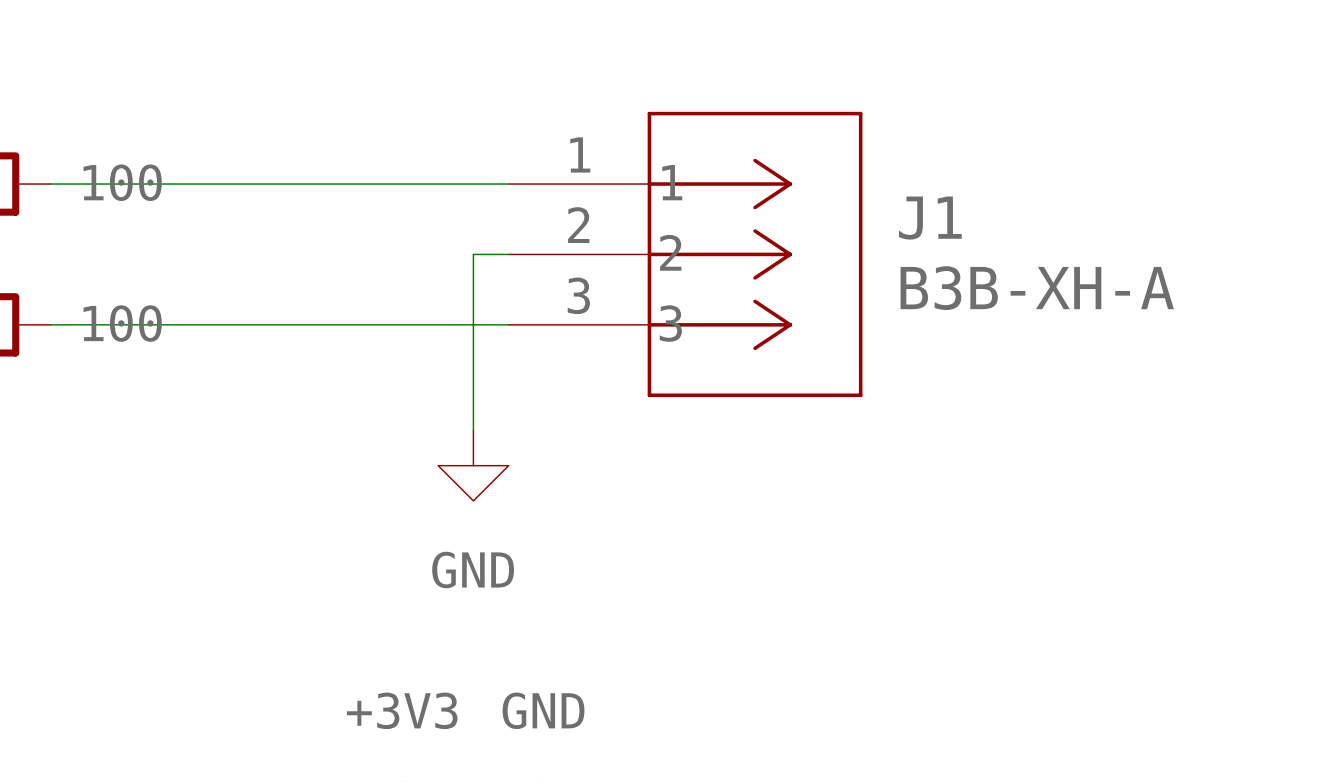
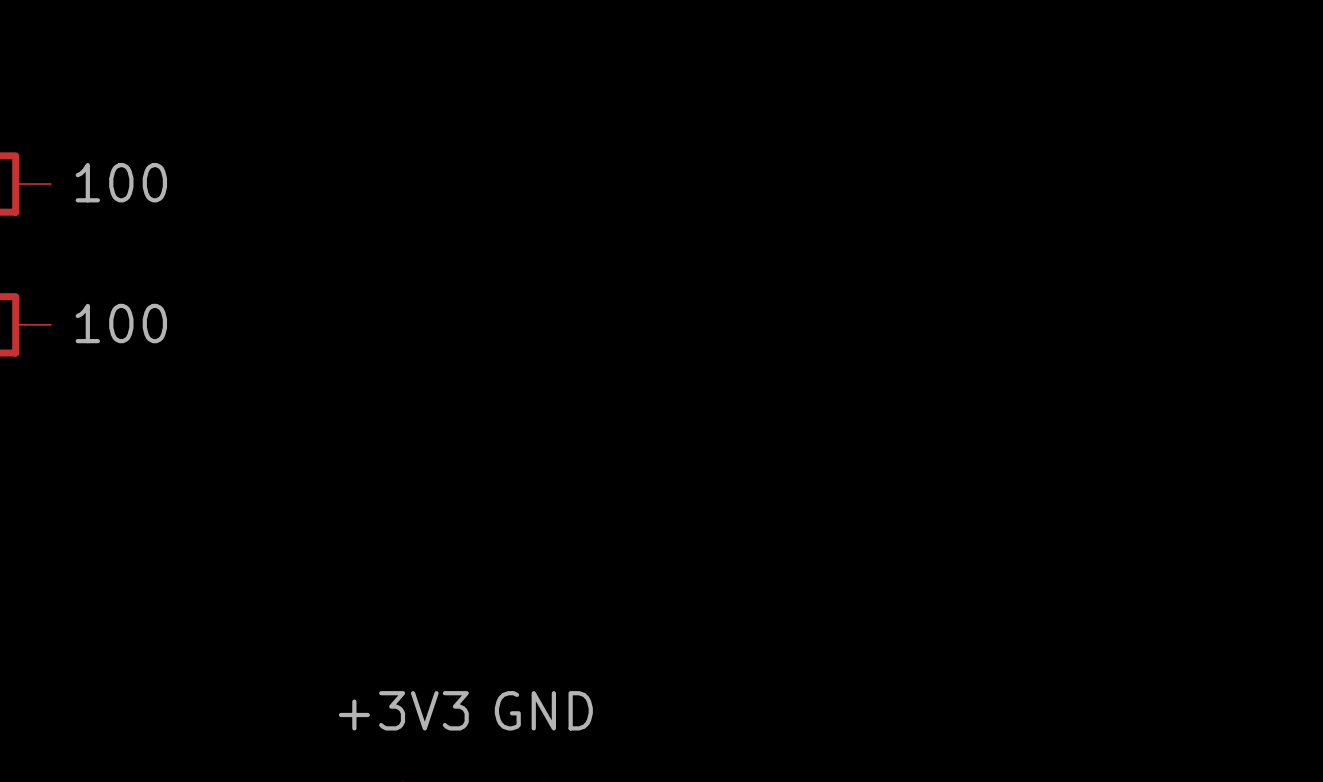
wire: (50, 184) (508, 184) -> none
wire: (508, 254) (473, 254) (473, 430) -> none
J1: B3B-XH-A (685, 254) -> none
wire: (50, 324) (508, 324) -> none
power symbol: GND (473, 465) -> none

